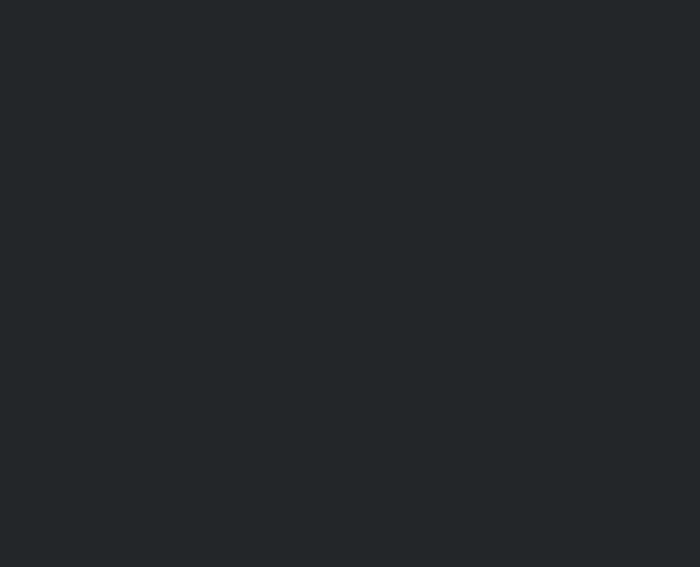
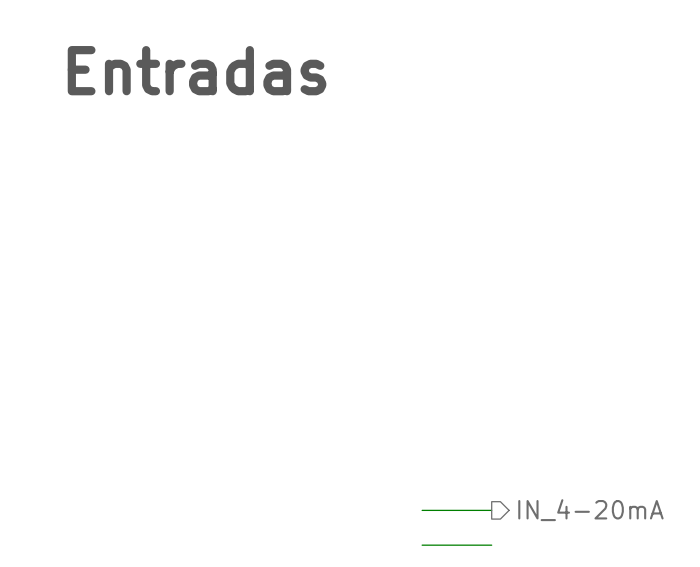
text: none -> Entradas (197, 70)
wire: none -> (422, 510) (491, 510)
sheet pin: none -> IN_4-20mA (590, 510)
wire: none -> (422, 545) (491, 545)

